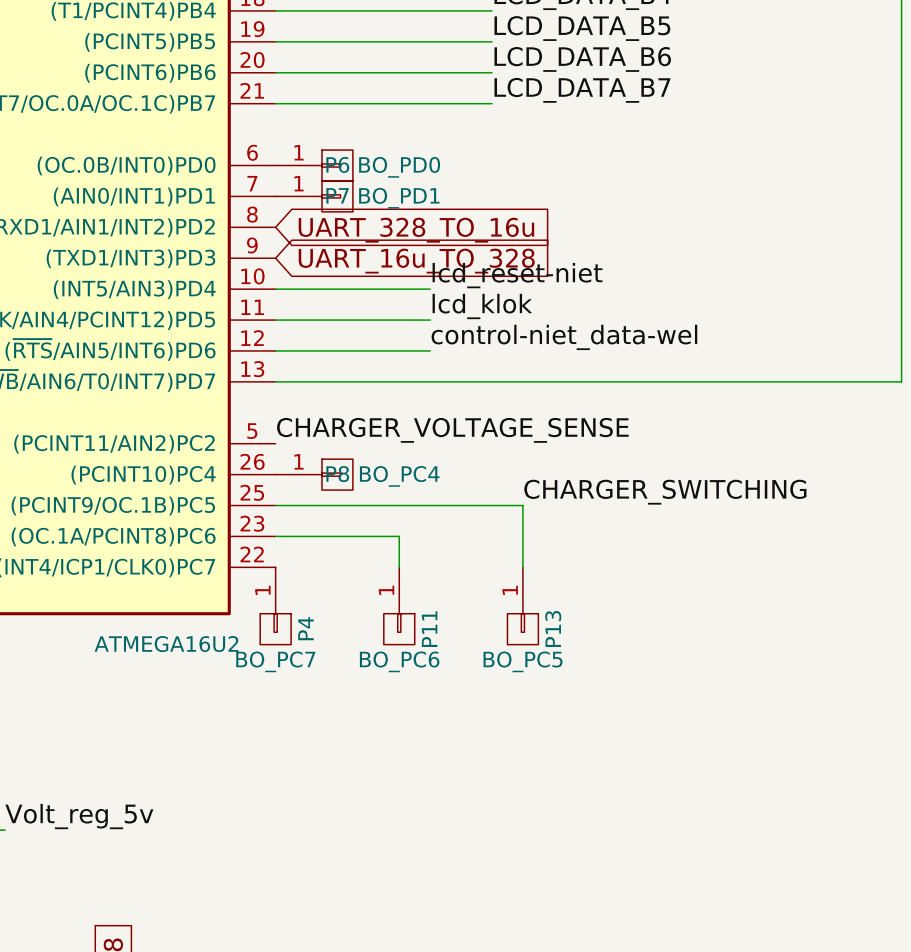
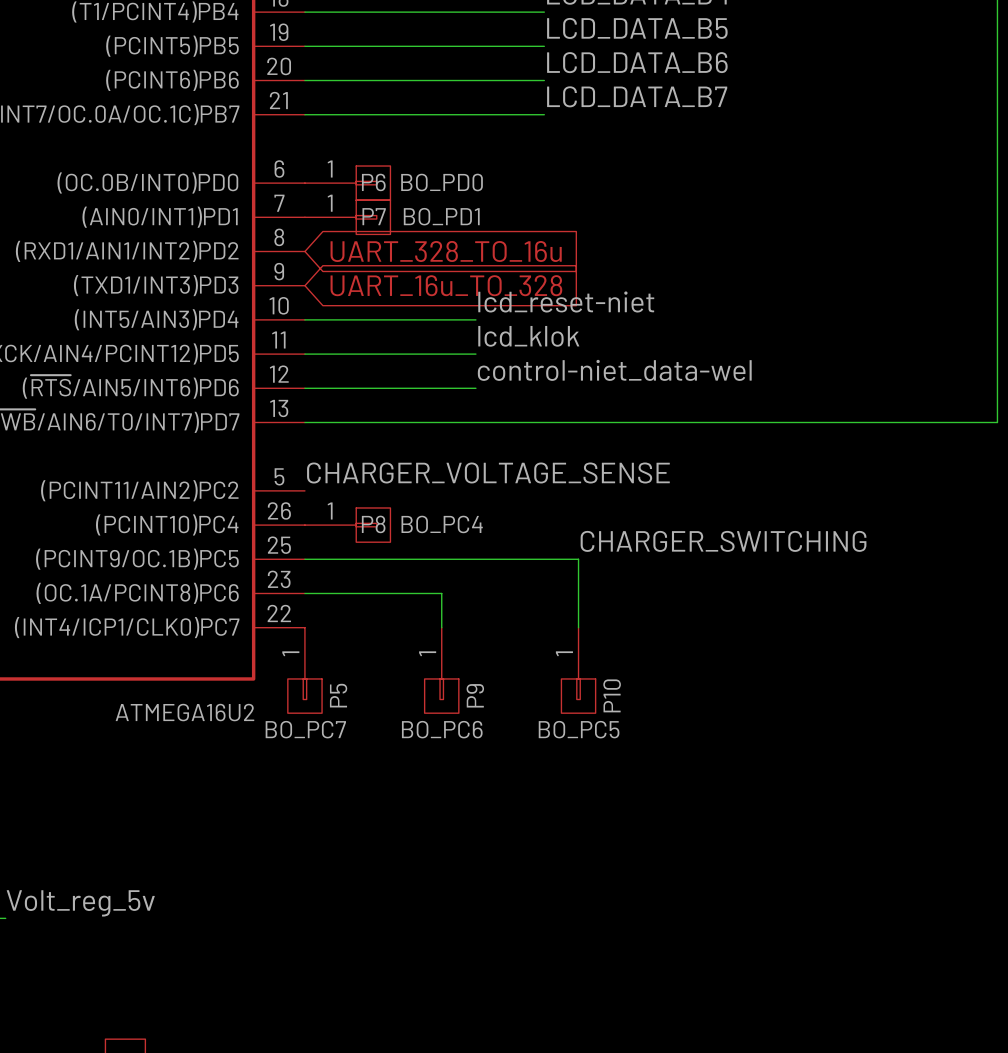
P4 name: P4 (305, 628) -> P5 (338, 695)
P13 name: P13 (553, 628) -> P10 (612, 695)
P11 name: P11 (429, 629) -> P9 (475, 695)

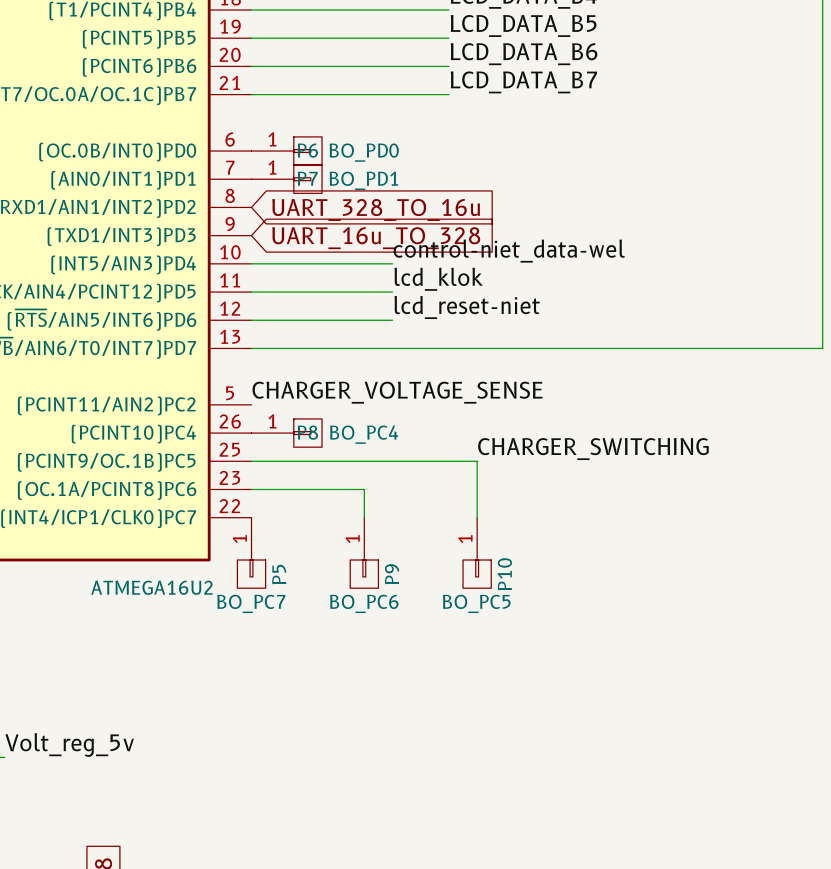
label: lcd_reset-niet (566, 301) -> control-niet_data-wel (509, 251)
label: control-niet_data-wel (614, 370) -> lcd_reset-niet (467, 307)

